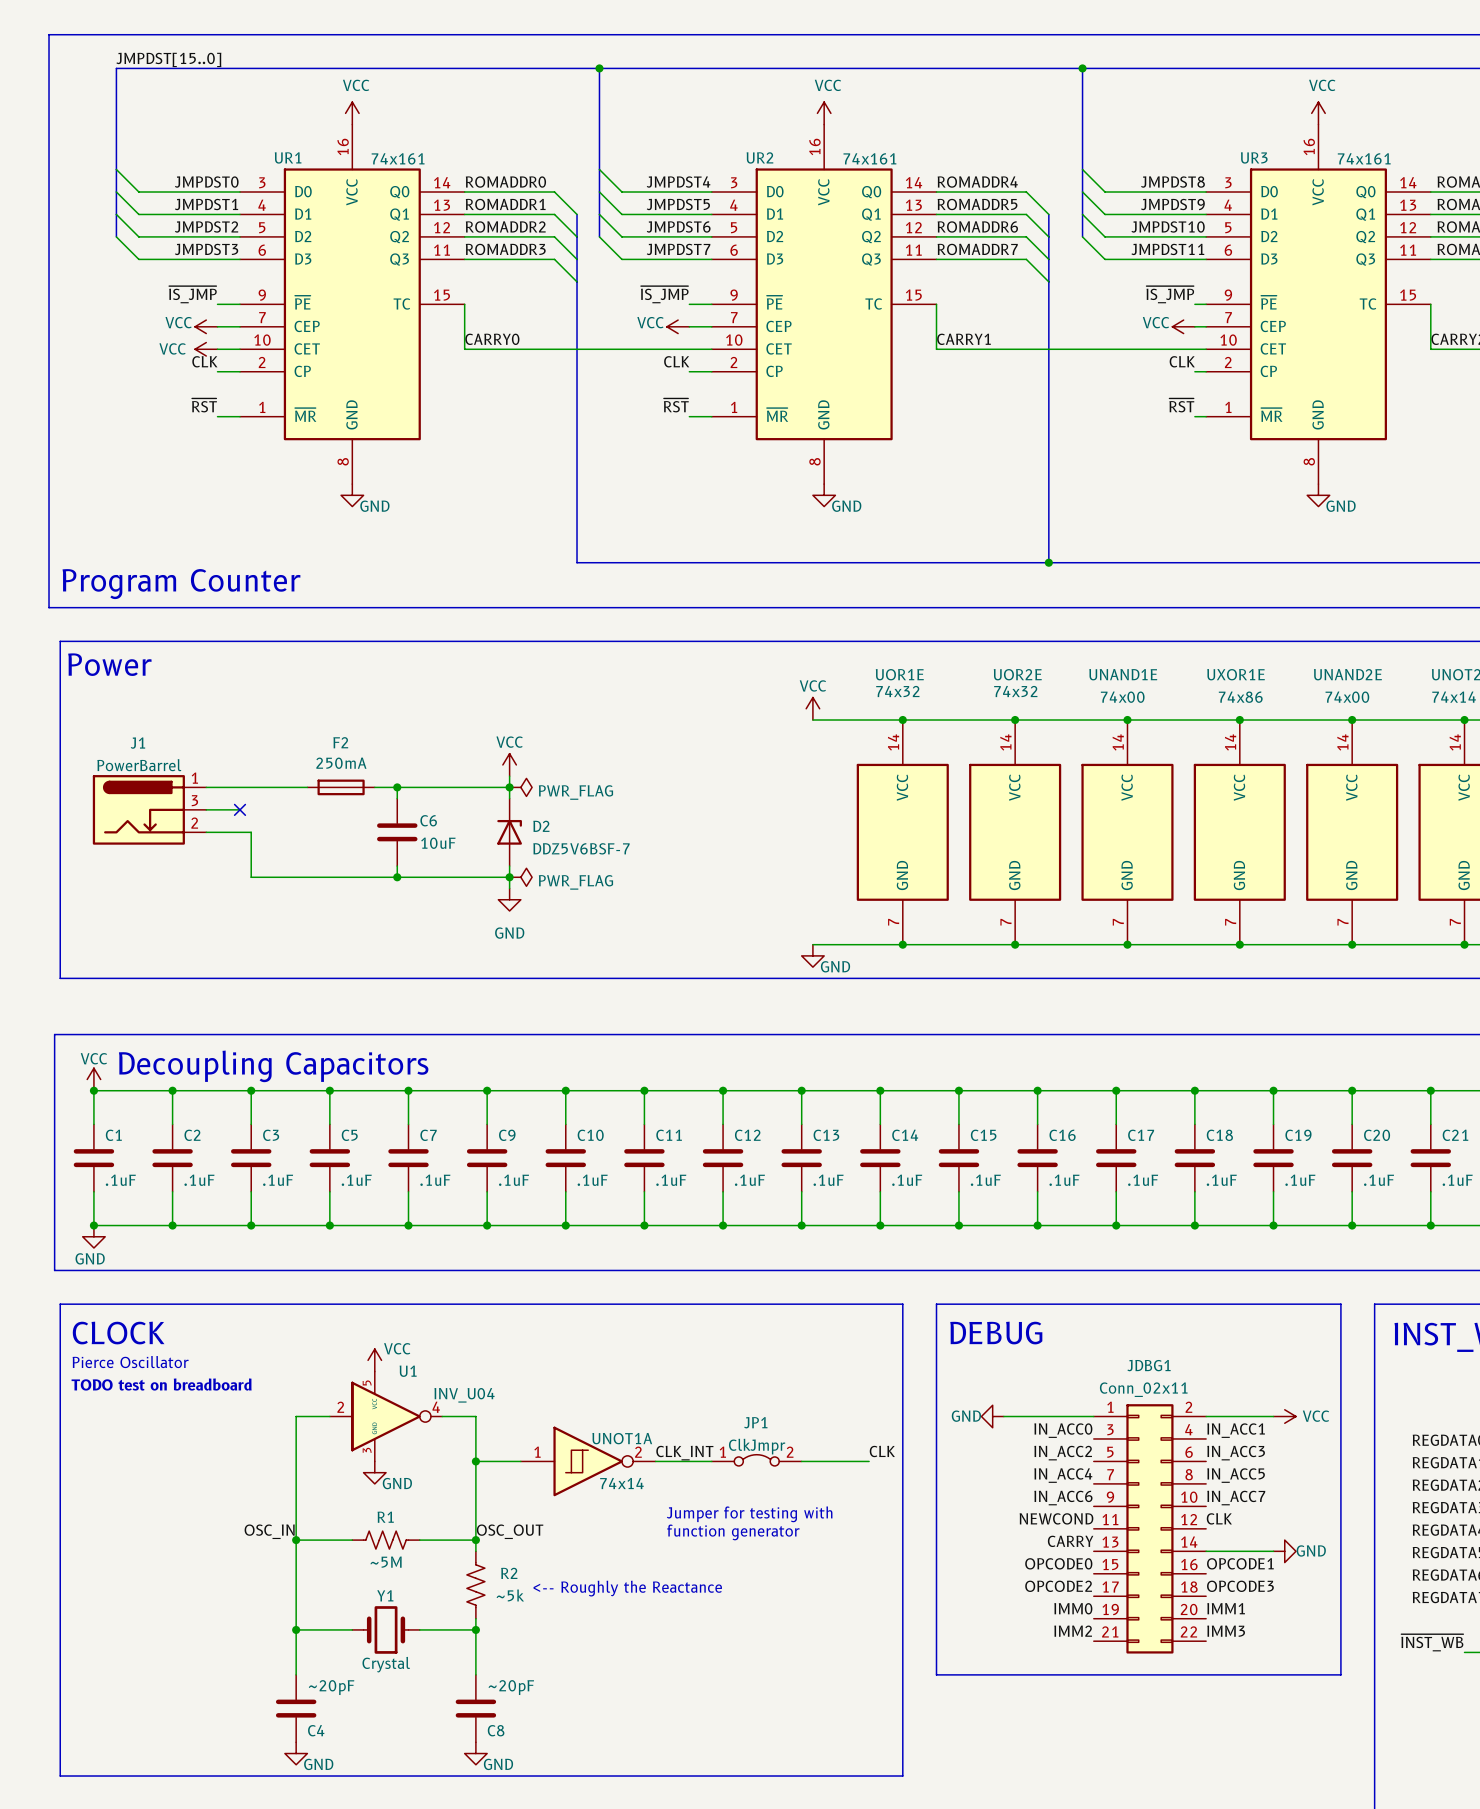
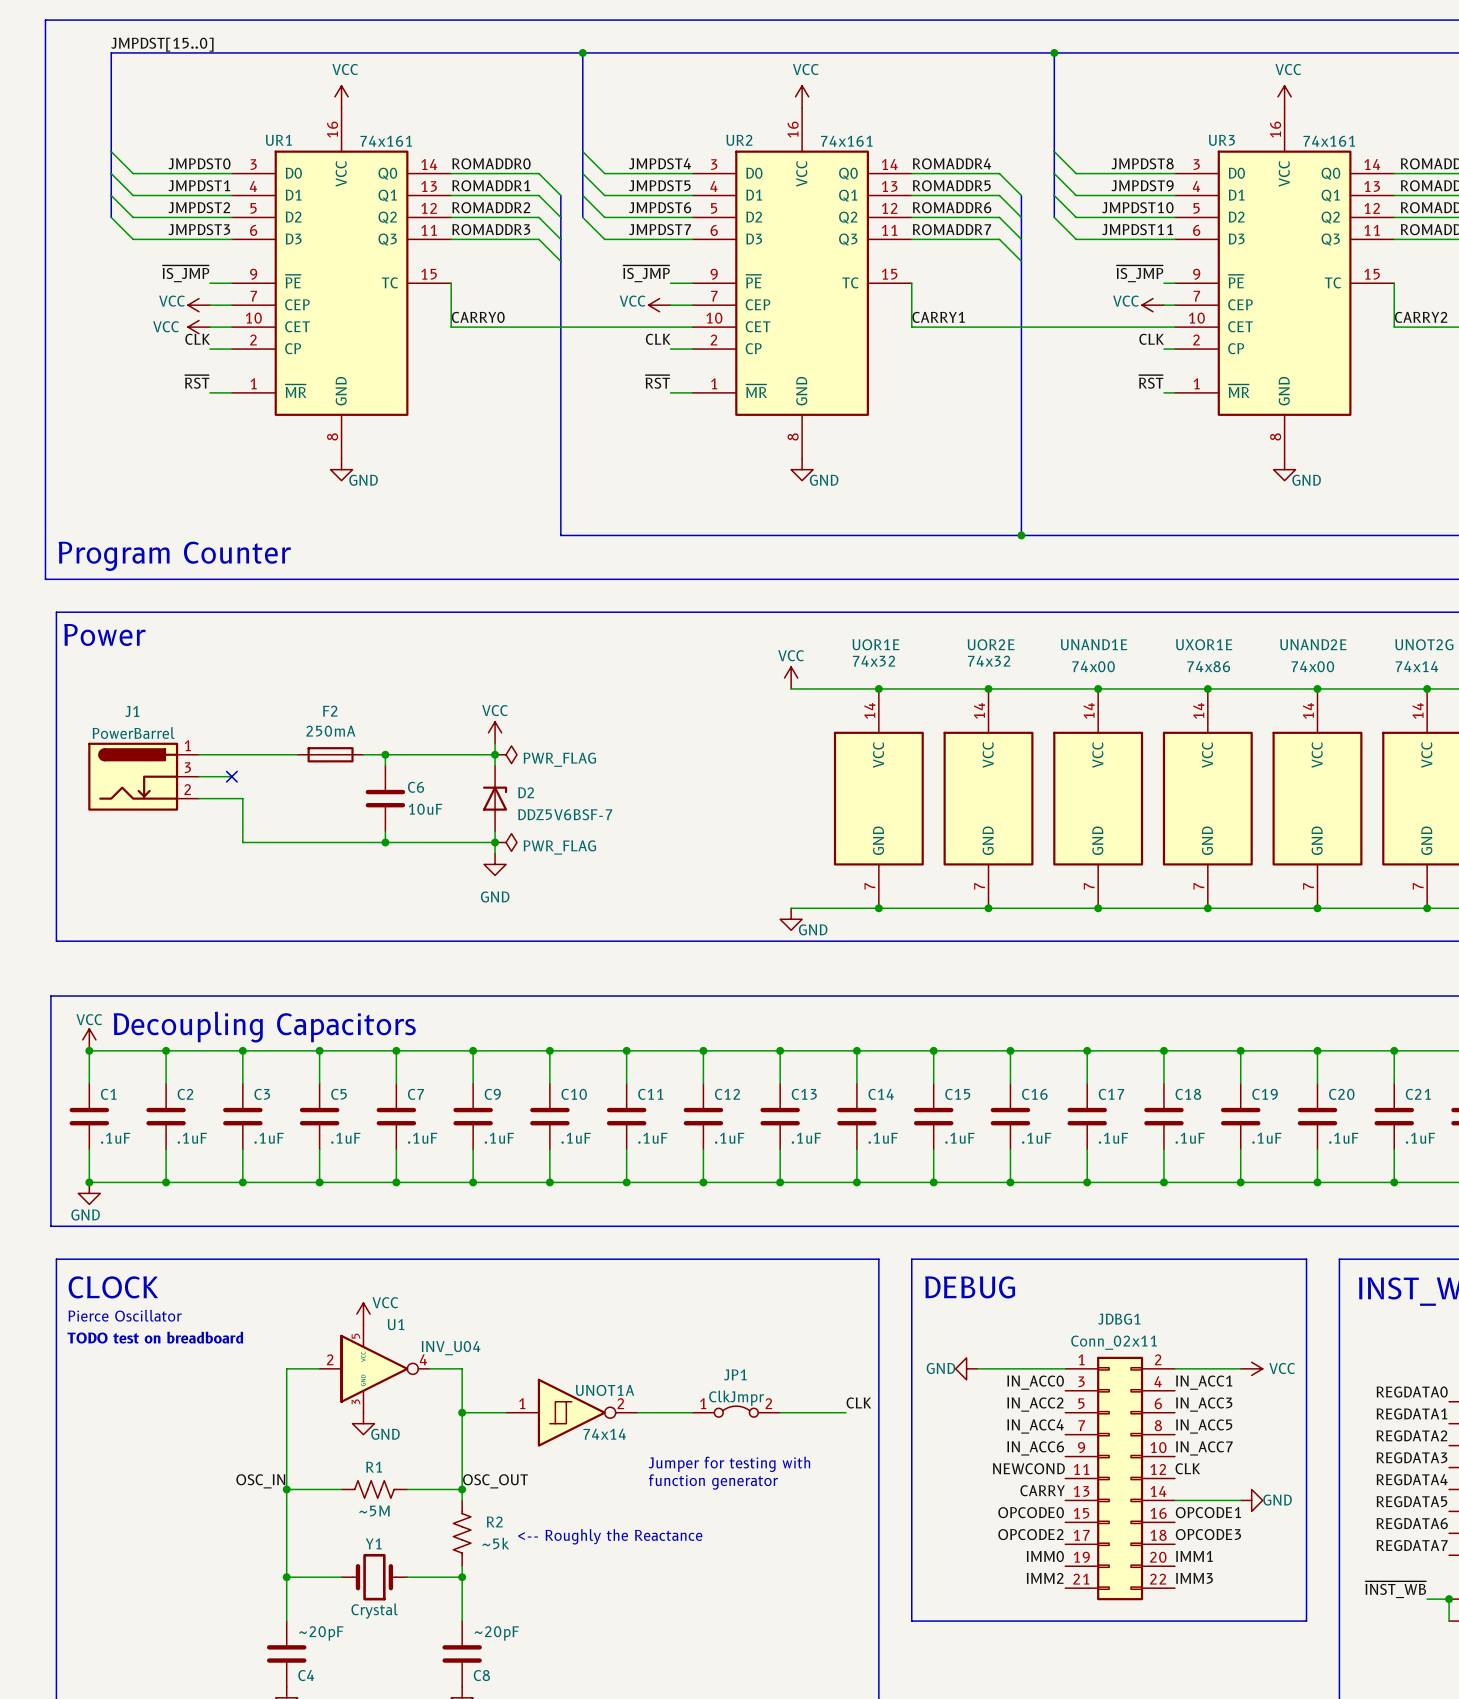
label: CLK_INT (684, 1453) -> none

